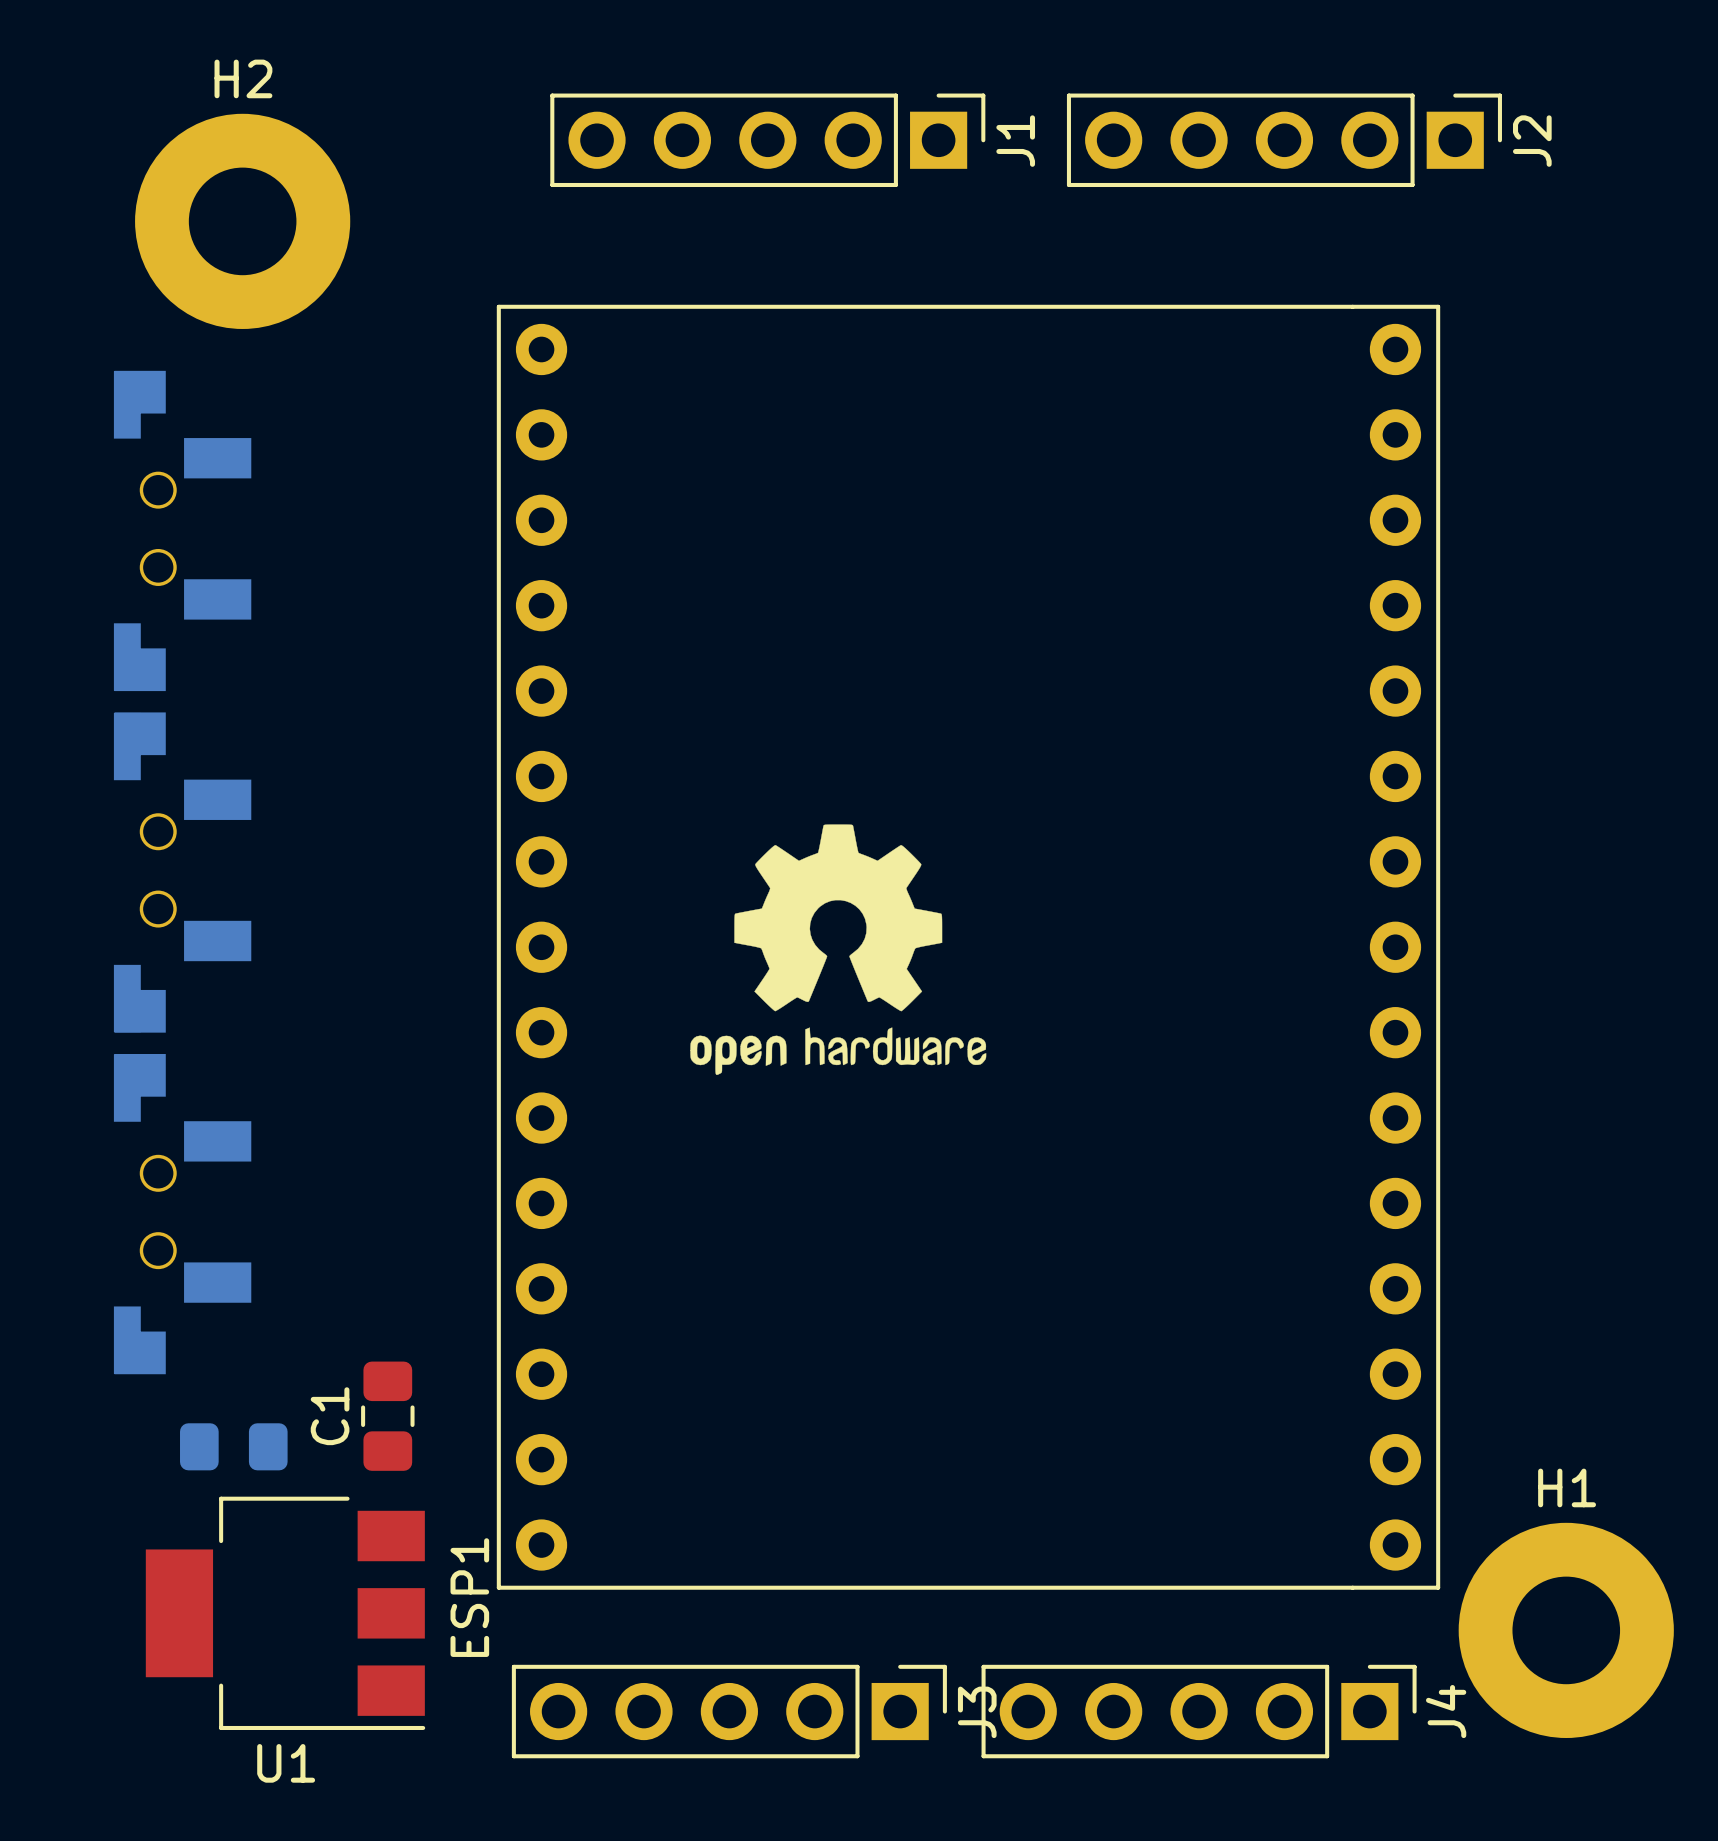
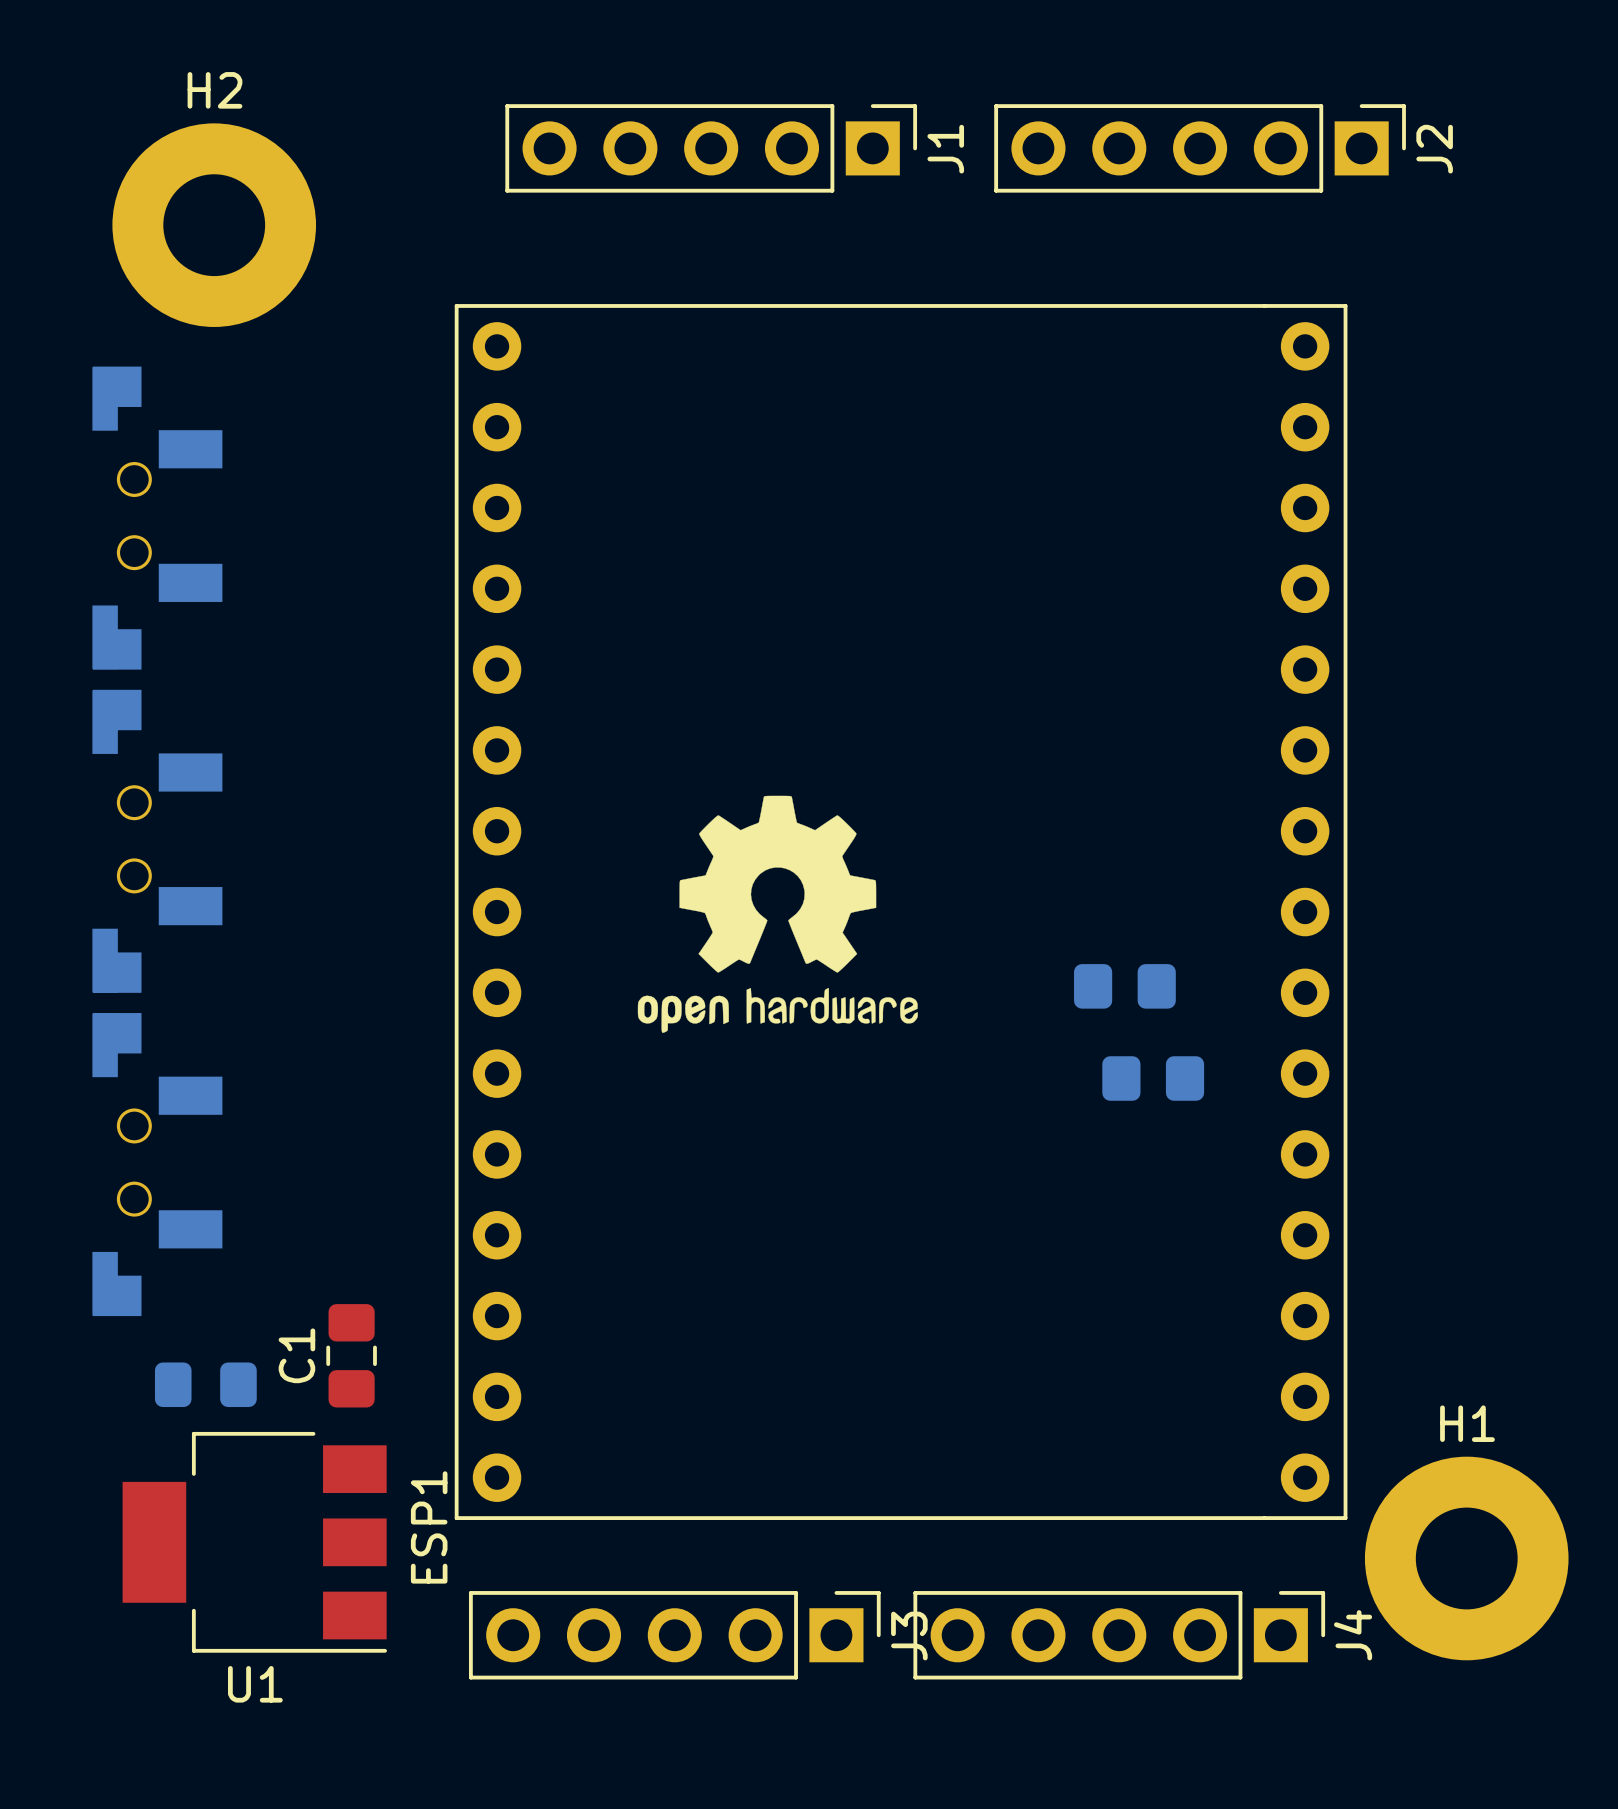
part: none -> (1124, 986)
part: none -> (1153, 1078)

